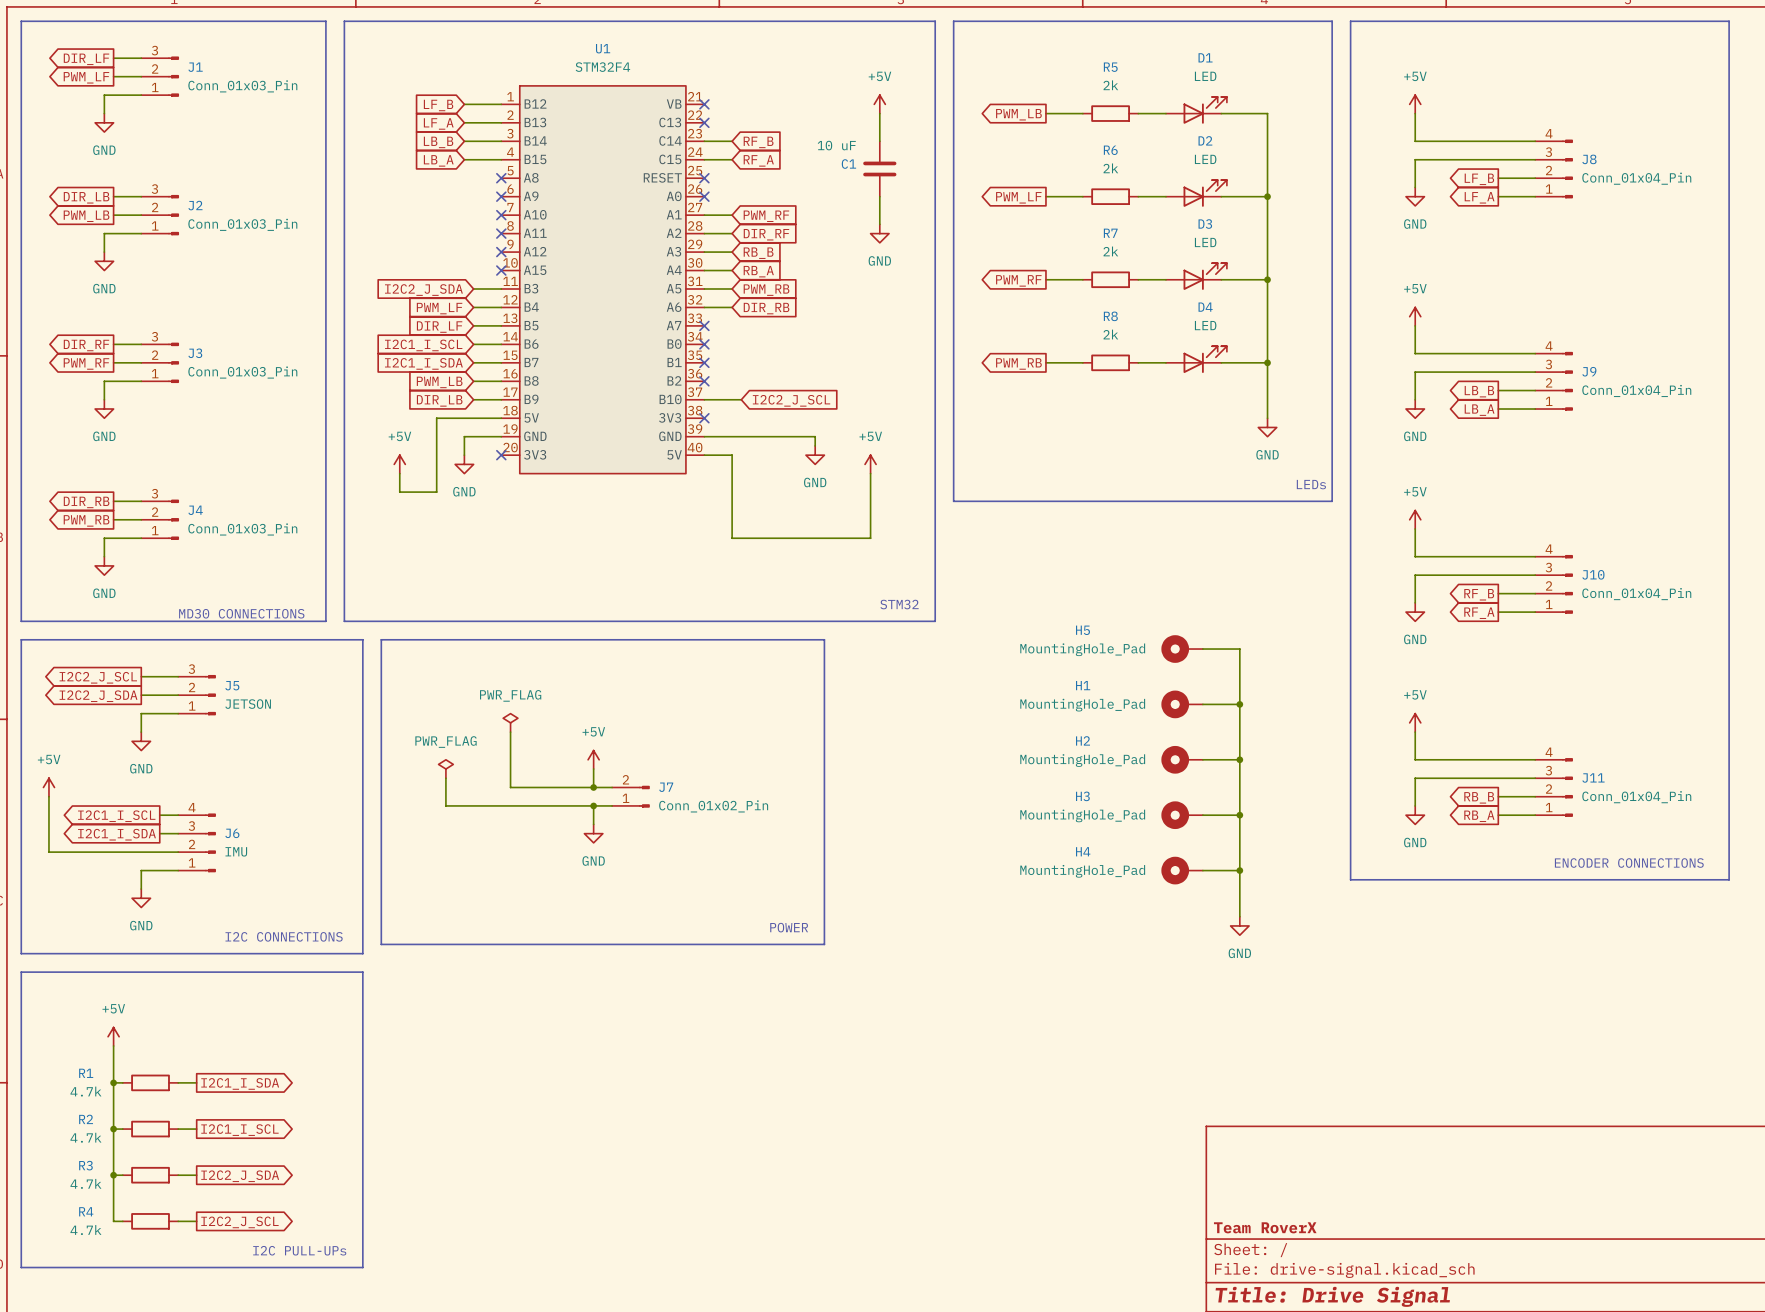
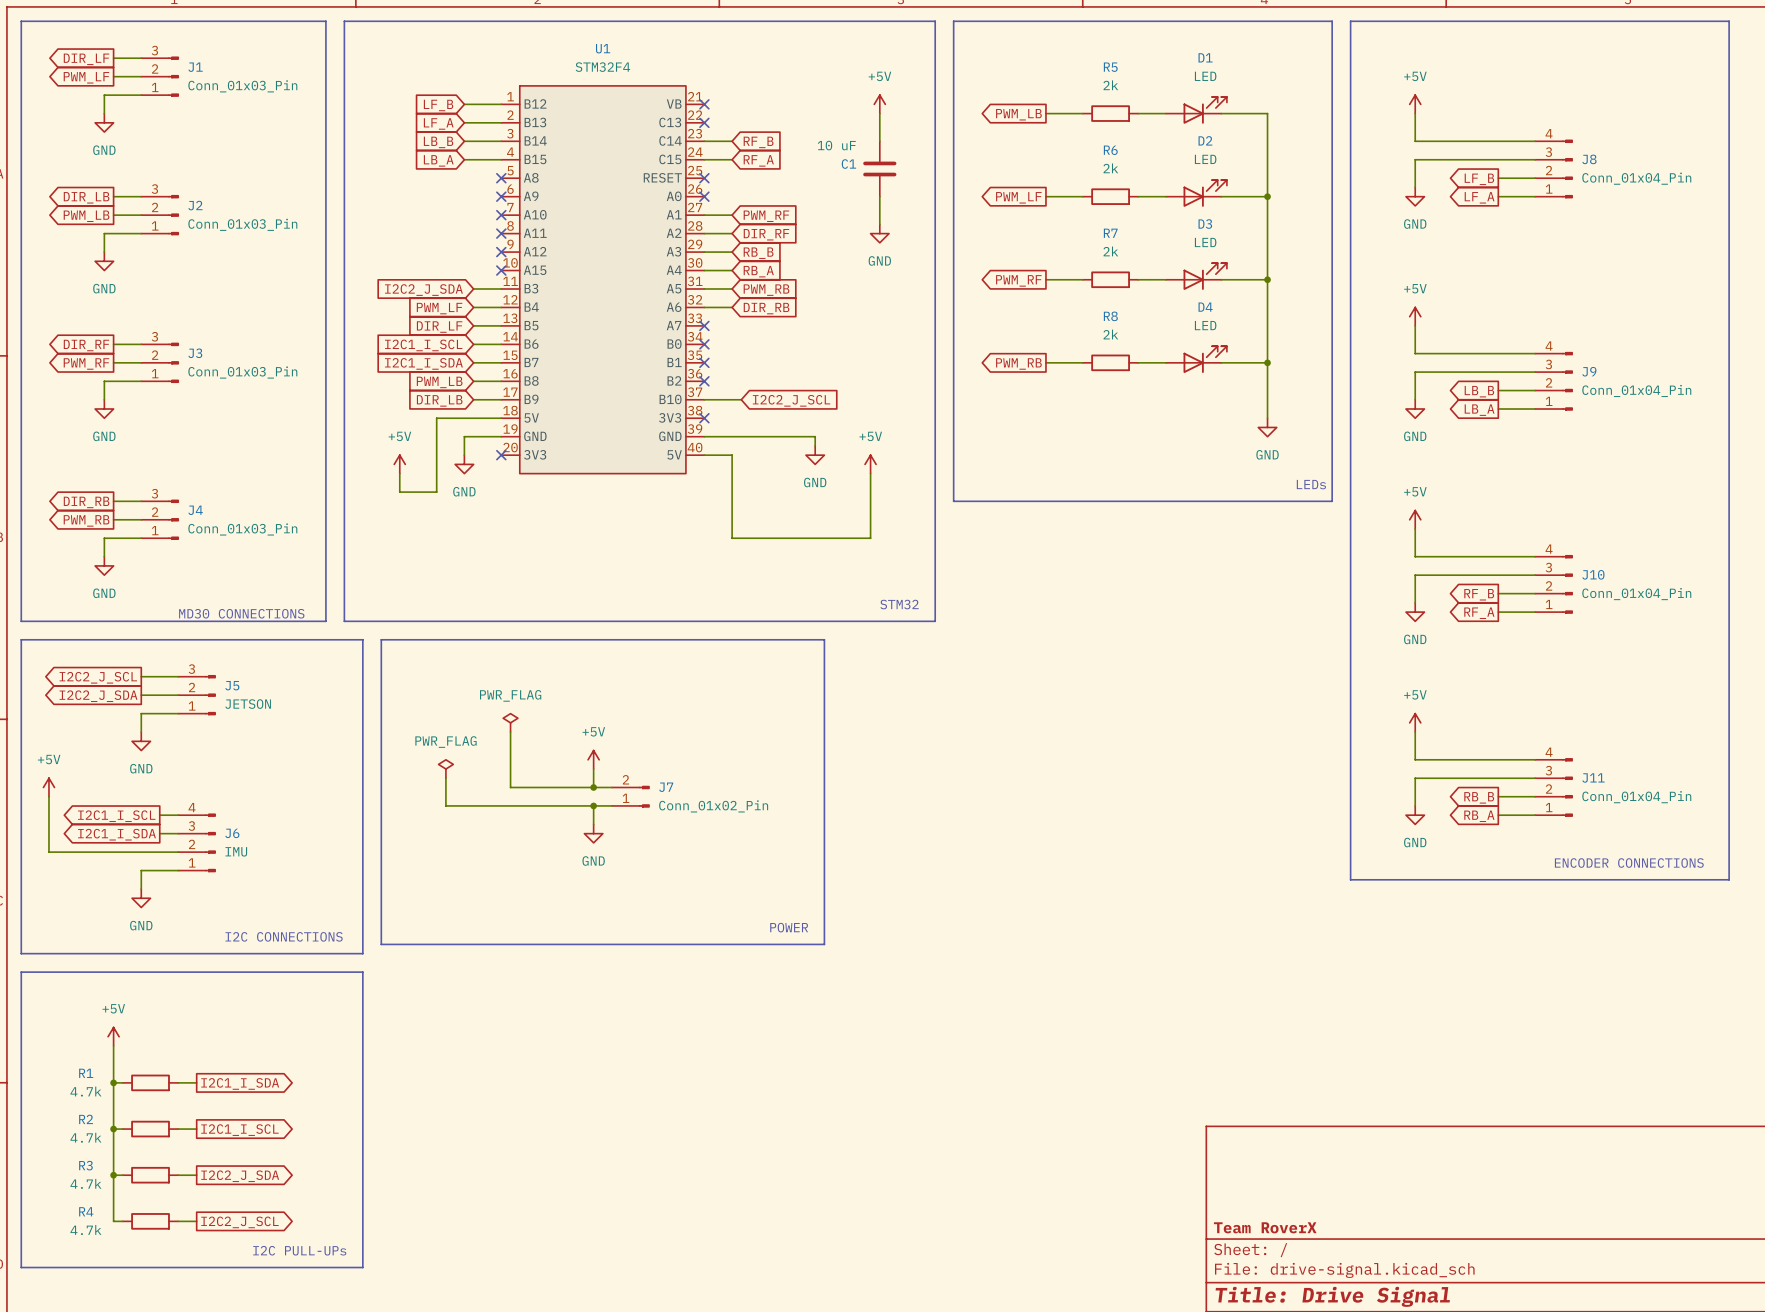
H5: MountingHole_Pad (1182, 649) -> none
wire: (1202, 649) (1239, 649) (1239, 916) -> none
H1: MountingHole_Pad (1182, 704) -> none
wire: (1202, 704) (1239, 704) -> none
junction: (1239, 704) -> none
H2: MountingHole_Pad (1182, 759) -> none
wire: (1202, 759) (1239, 759) -> none
junction: (1239, 759) -> none
H3: MountingHole_Pad (1182, 815) -> none
wire: (1202, 815) (1239, 815) -> none
junction: (1239, 815) -> none
H4: MountingHole_Pad (1182, 870) -> none
wire: (1202, 870) (1239, 870) -> none
junction: (1239, 870) -> none
power symbol: GND (1239, 925) -> none

